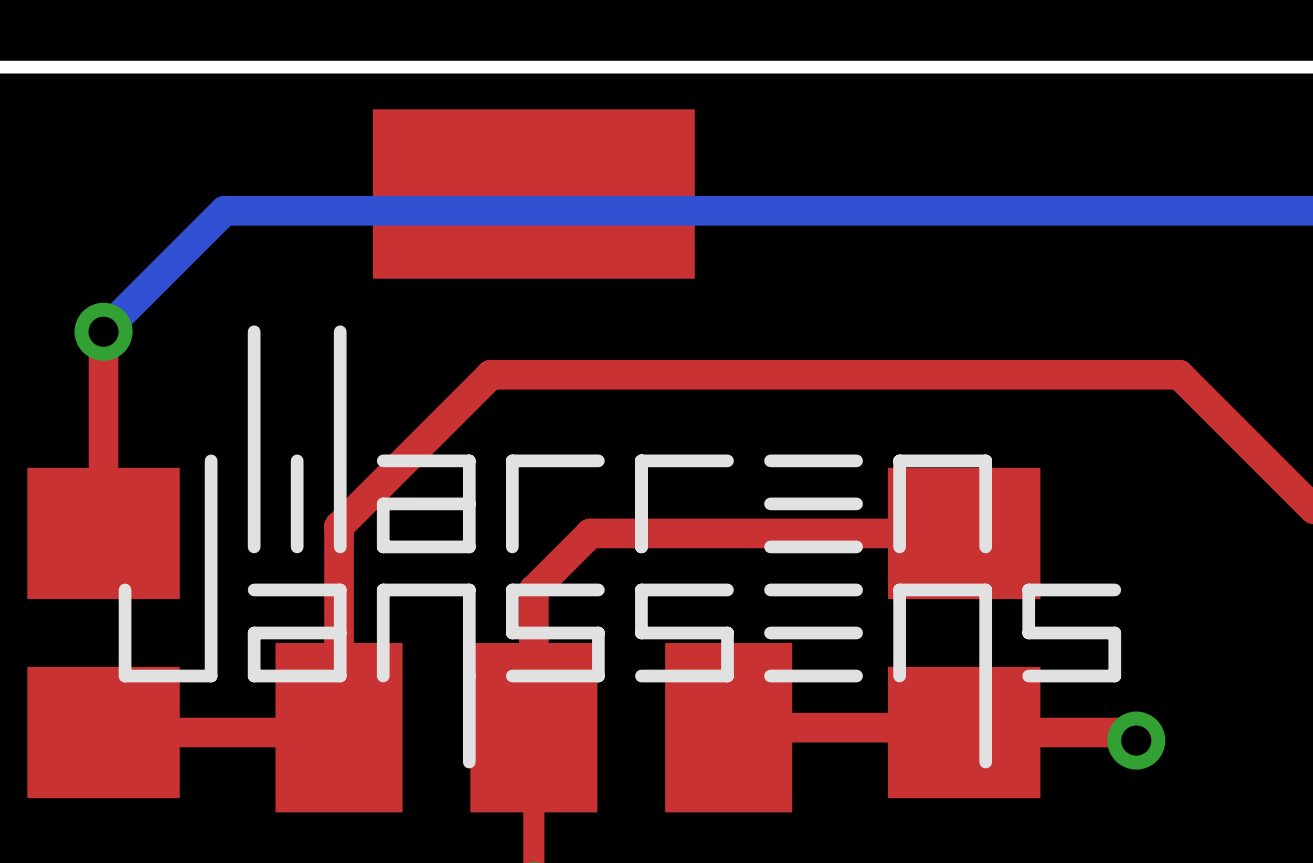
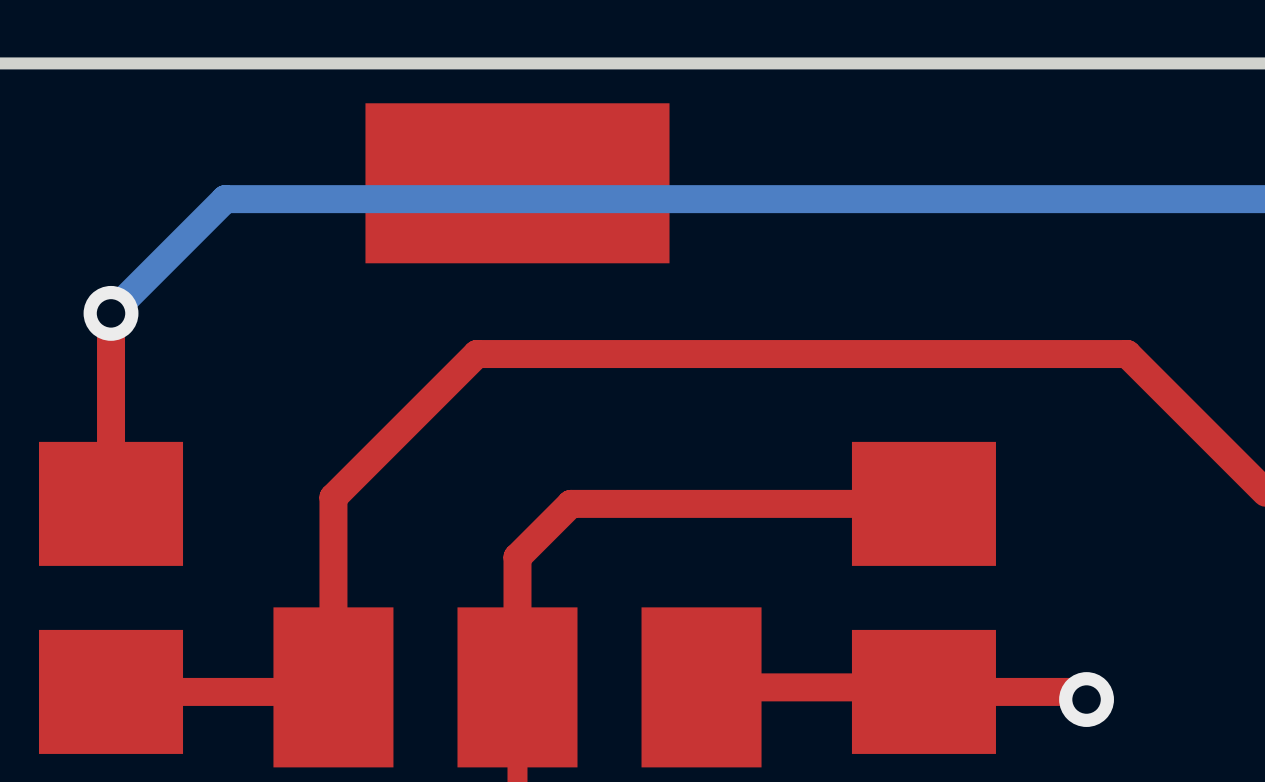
drawing: [118, 325, 1122, 769] -> none

